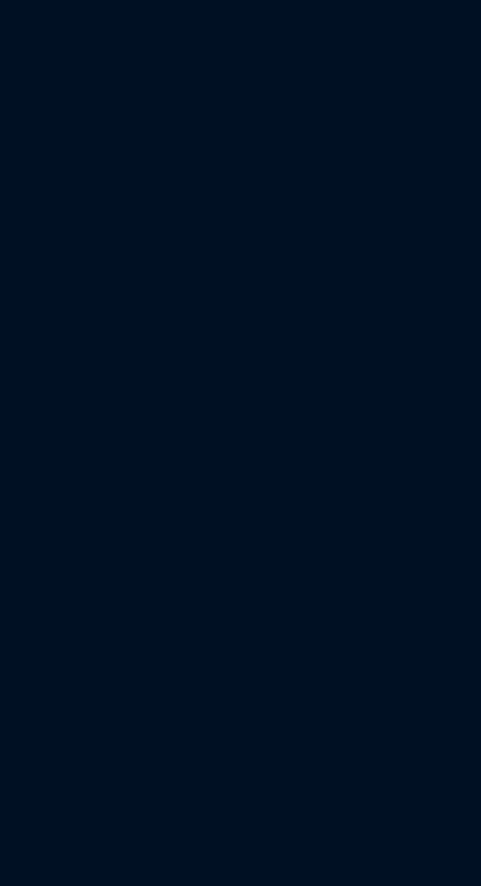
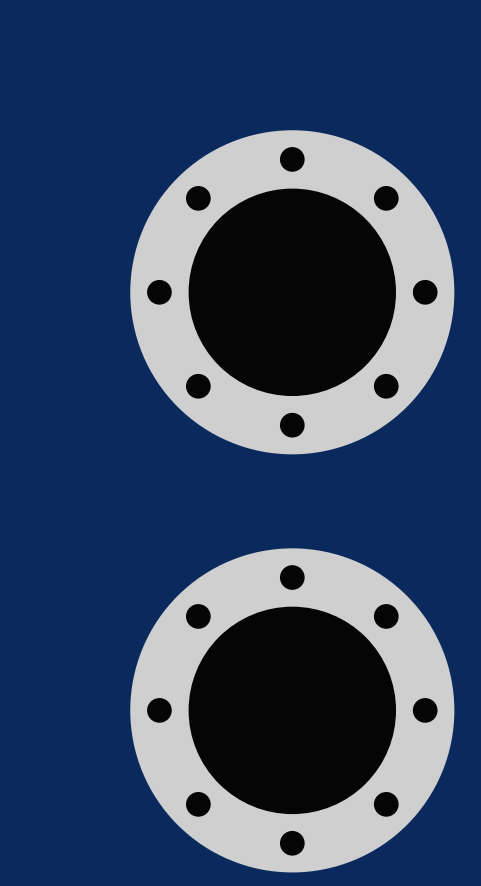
part: none -> (292, 292)
part: none -> (292, 710)

